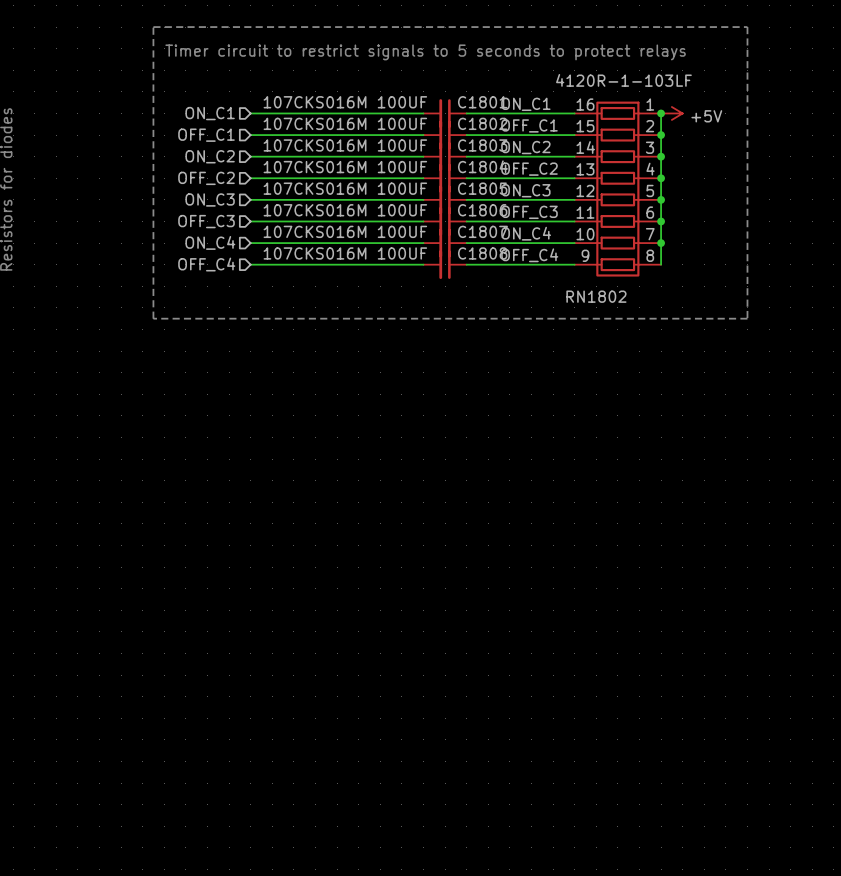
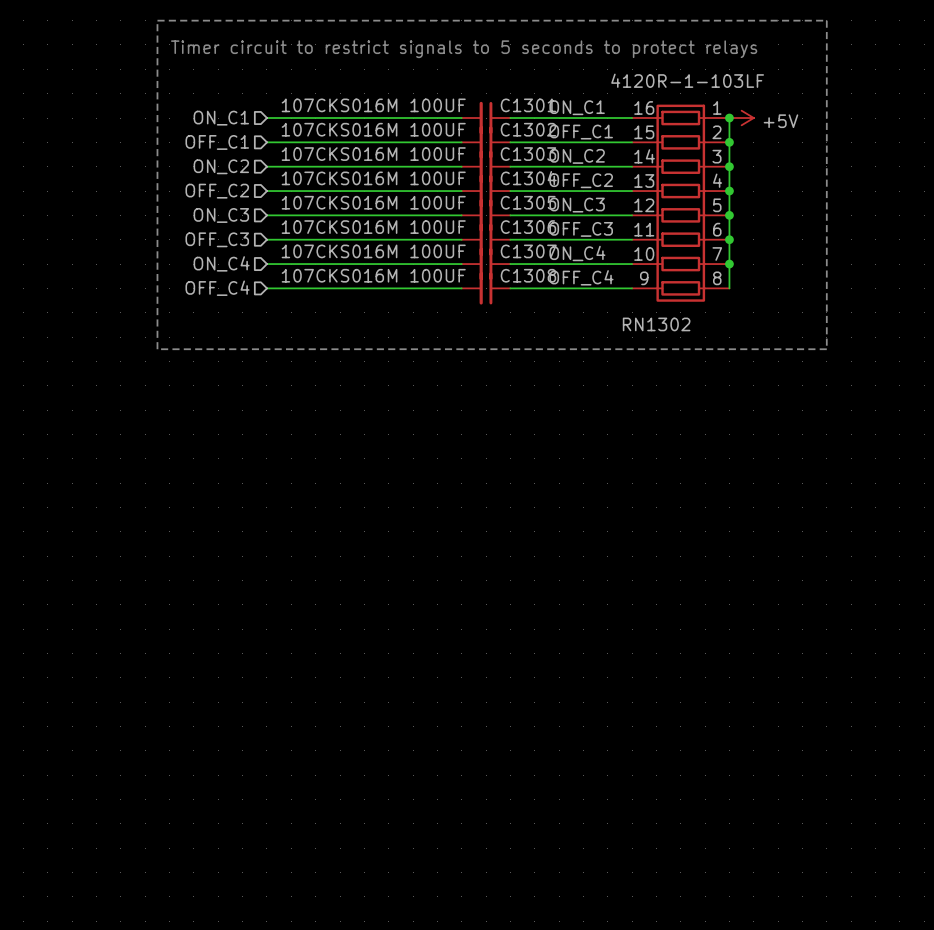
C1801 name: C1801 (482, 102) -> C1301 (528, 105)
C1802 name: C1802 (482, 123) -> C1302 (528, 129)
C1803 name: C1803 (482, 145) -> C1303 (528, 154)
C1804 name: C1804 (482, 166) -> C1304 (528, 178)
C1805 name: C1805 (482, 188) -> C1305 (528, 202)
C1806 name: C1806 (482, 210) -> C1306 (528, 227)
C1807 name: C1807 (482, 231) -> C1307 (528, 251)
C1808 name: C1808 (482, 253) -> C1308 (528, 275)
RN1802 name: RN1802 (596, 296) -> RN1302 (656, 324)

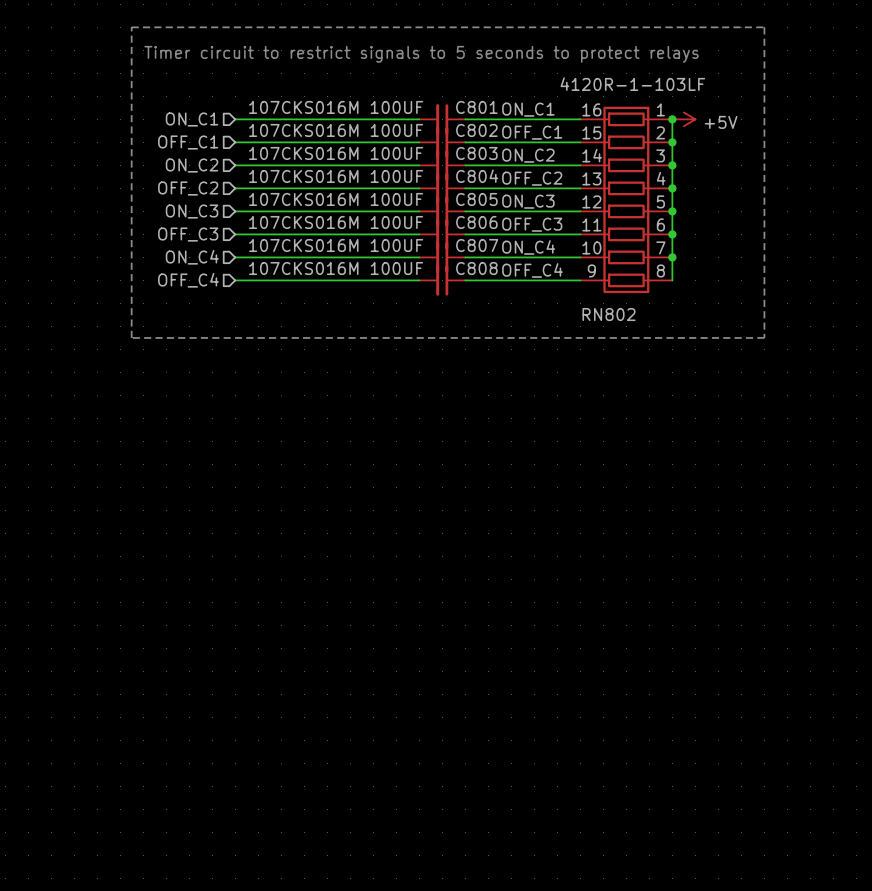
C1301 name: C1301 (528, 105) -> C801 (476, 107)
C1302 name: C1302 (528, 129) -> C802 (476, 130)
C1303 name: C1303 (528, 154) -> C803 (476, 153)
C1304 name: C1304 (528, 178) -> C804 (477, 176)
C1305 name: C1305 (528, 202) -> C805 (476, 199)
C1306 name: C1306 (528, 227) -> C806 (476, 222)
C1307 name: C1307 (528, 251) -> C807 (477, 245)
C1308 name: C1308 (528, 275) -> C808 (476, 268)
RN1302 name: RN1302 (656, 324) -> RN802 (609, 314)

